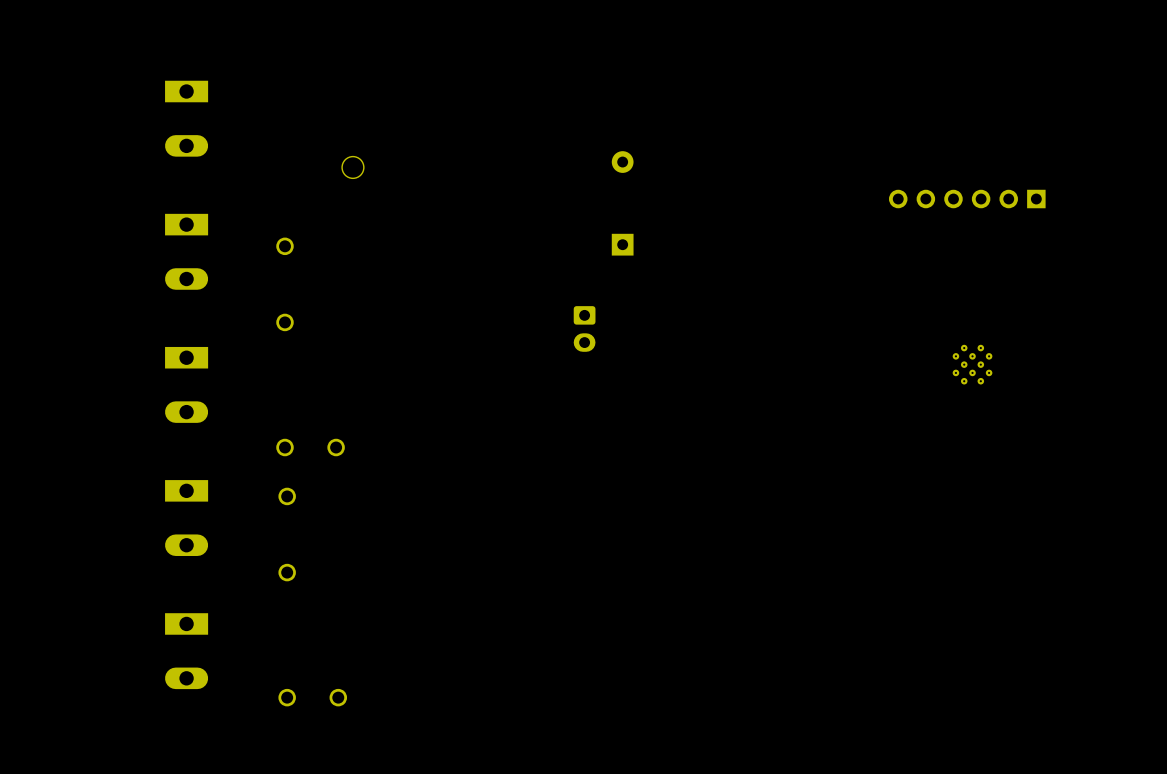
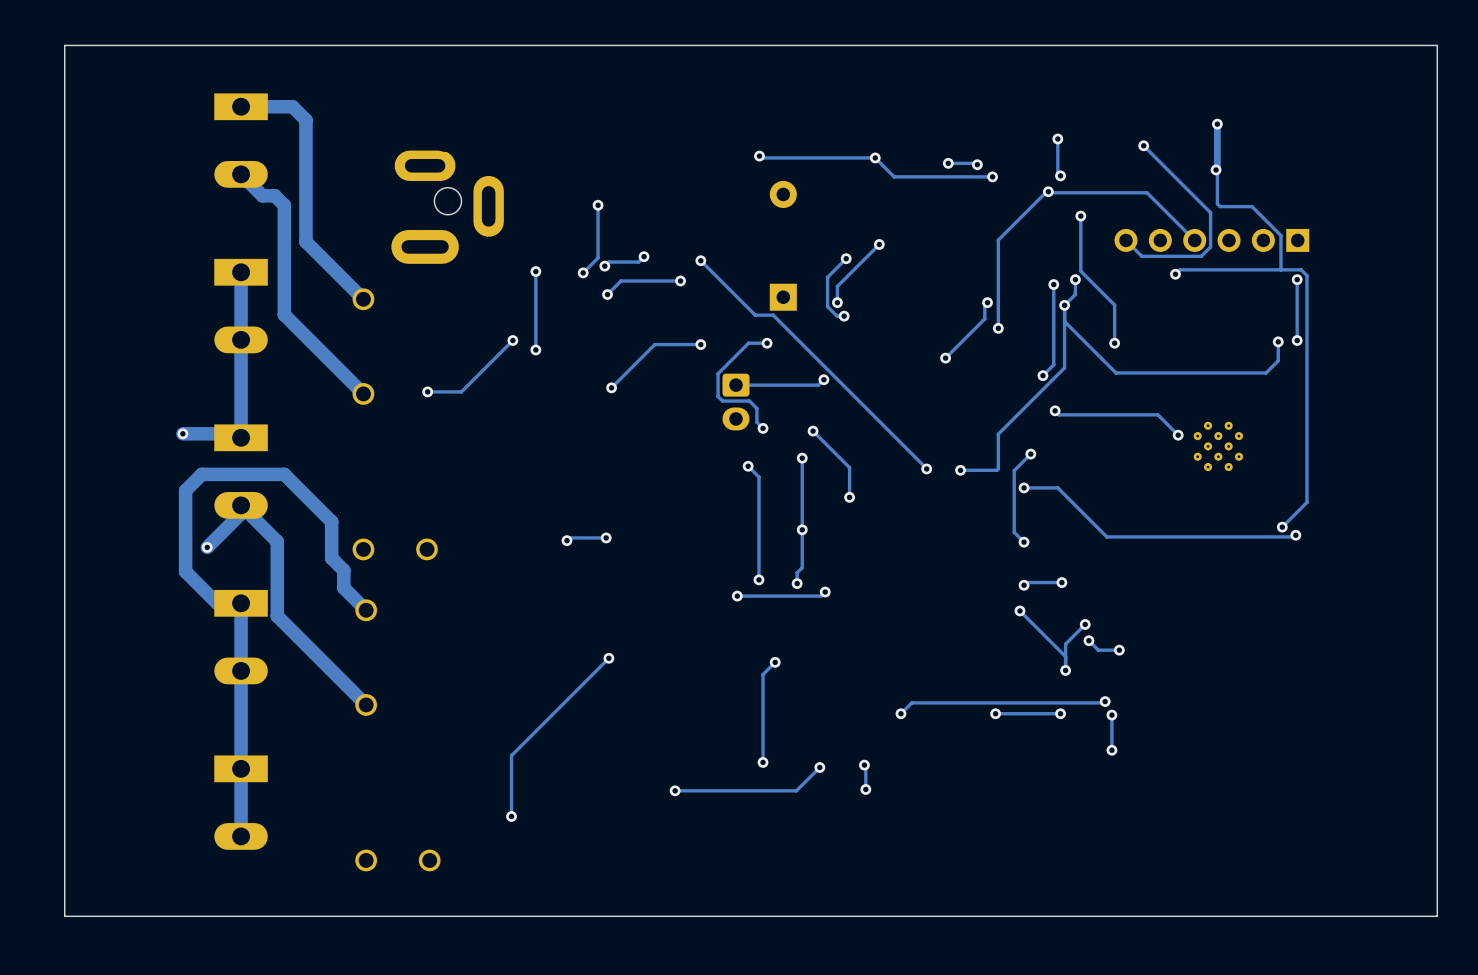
board edge: none -> (1437, 45) (64, 45) (64, 916) (1437, 916) (1437, 45)
track: none -> (241, 106) (292, 106) (305, 120) (305, 241) (363, 299)
track: none -> (1217, 124) (1217, 203) (1220, 206) (1252, 206) (1280, 235) (1280, 269)
via: none -> (1217, 124)
track: none -> (1057, 139) (1057, 173) (1060, 175)
via: none -> (1057, 139)
track: none -> (1143, 145) (1210, 212) (1210, 247) (1201, 256) (1141, 256) (1125, 240)
via: none -> (1143, 145)
track: none -> (759, 156) (761, 157) (875, 157) (894, 176) (992, 176)
via: none -> (759, 156)
via: none -> (875, 157)
track: none -> (948, 163) (977, 164)
via: none -> (948, 163)
via: none -> (977, 164)
via: none -> (1216, 169)
track: none -> (241, 174) (262, 195) (274, 195) (284, 205) (284, 314) (363, 393)
via: none -> (992, 176)
via: none -> (1060, 175)
via: none -> (1048, 191)
track: none -> (598, 205) (598, 258) (583, 272)
via: none -> (598, 205)
part: none -> (447, 207)
track: none -> (1080, 216) (1080, 271) (1114, 305) (1114, 343)
via: none -> (1080, 216)
track: none -> (1194, 240) (1147, 192) (1046, 191) (998, 240) (998, 328)
track: none -> (879, 244) (837, 286) (837, 302)
via: none -> (879, 244)
track: none -> (644, 256) (638, 262) (608, 262) (604, 266)
via: none -> (644, 256)
track: none -> (846, 258) (827, 277) (827, 306) (837, 316) (844, 316)
via: none -> (846, 258)
track: none -> (700, 260) (755, 315) (773, 315) (926, 468)
via: none -> (700, 260)
via: none -> (604, 266)
track: none -> (241, 272) (241, 437) (237, 433) (182, 433)
track: none -> (535, 271) (535, 349)
via: none -> (535, 271)
via: none -> (583, 272)
track: none -> (1175, 274) (1179, 269) (1301, 269) (1306, 275) (1306, 502) (1282, 527)
via: none -> (1175, 274)
track: none -> (1075, 279) (1075, 294) (1064, 305) (1064, 367) (998, 434) (996, 470) (960, 470)
via: none -> (1075, 279)
track: none -> (1297, 279) (1297, 340)
via: none -> (1297, 279)
track: none -> (680, 281) (621, 281) (607, 294)
via: none -> (680, 281)
track: none -> (1053, 284) (1053, 364) (1042, 375)
via: none -> (1053, 284)
via: none -> (607, 294)
via: none -> (837, 302)
track: none -> (987, 302) (984, 305) (984, 318) (945, 358)
via: none -> (987, 302)
via: none -> (1064, 305)
via: none -> (844, 316)
track: none -> (1064, 321) (1115, 372) (1266, 372) (1278, 360) (1278, 341)
via: none -> (998, 328)
track: none -> (512, 340) (461, 391) (427, 391)
via: none -> (512, 340)
via: none -> (1297, 340)
via: none -> (1278, 341)
track: none -> (767, 343) (748, 343) (718, 373) (718, 396) (722, 401) (749, 401) (756, 408) (756, 422) (763, 428)
via: none -> (767, 343)
via: none -> (1114, 343)
track: none -> (700, 344) (654, 344) (611, 387)
via: none -> (700, 344)
via: none -> (535, 349)
via: none -> (945, 358)
via: none -> (1042, 375)
track: none -> (823, 379) (818, 385) (735, 385)
via: none -> (823, 379)
via: none -> (611, 387)
via: none -> (427, 391)
track: none -> (1055, 410) (1059, 414) (1157, 414) (1178, 435)
via: none -> (1055, 410)
via: none -> (763, 428)
track: none -> (813, 431) (849, 467) (849, 497)
via: none -> (813, 431)
via: none -> (182, 433)
via: none -> (1178, 435)
track: none -> (1030, 454) (1014, 470) (1014, 532) (1024, 542)
via: none -> (1030, 454)
track: none -> (802, 458) (802, 567) (797, 572) (797, 583)
via: none -> (802, 458)
track: none -> (748, 466) (758, 477) (758, 579)
via: none -> (748, 466)
via: none -> (926, 468)
via: none -> (960, 470)
track: none -> (1024, 487) (1057, 487) (1106, 536) (1294, 536) (1295, 535)
via: none -> (1024, 487)
via: none -> (849, 497)
via: none -> (1282, 527)
via: none -> (802, 529)
via: none -> (1295, 535)
track: none -> (606, 537) (569, 537) (566, 540)
via: none -> (606, 537)
via: none -> (566, 540)
via: none -> (1024, 542)
track: none -> (207, 547) (241, 513) (241, 505) (277, 541) (277, 616) (366, 704)
via: none -> (207, 547)
via: none -> (758, 579)
via: none -> (797, 583)
track: none -> (1061, 582) (1026, 582) (1024, 585)
via: none -> (1061, 582)
via: none -> (1024, 585)
track: none -> (825, 592) (821, 596) (737, 596)
via: none -> (825, 592)
via: none -> (737, 596)
track: none -> (366, 610) (343, 587) (343, 570) (331, 558) (331, 521) (284, 474) (201, 474) (185, 490) (185, 571) (217, 603) (241, 603) (241, 836)
track: none -> (1019, 610) (1065, 656)
via: none -> (1019, 610)
track: none -> (1085, 624) (1065, 644) (1065, 670)
via: none -> (1085, 624)
track: none -> (1088, 640) (1098, 650) (1119, 650)
via: none -> (1088, 640)
via: none -> (1119, 650)
track: none -> (608, 658) (511, 755) (511, 816)
via: none -> (608, 658)
track: none -> (775, 662) (763, 674) (763, 762)
via: none -> (775, 662)
via: none -> (1065, 670)
track: none -> (1105, 701) (911, 702) (900, 713)
via: none -> (1105, 701)
via: none -> (900, 713)
via: none -> (995, 713)
track: none -> (1060, 713) (995, 713)
via: none -> (1060, 713)
track: none -> (1111, 715) (1111, 750)
via: none -> (1111, 715)
via: none -> (1111, 750)
via: none -> (763, 762)
track: none -> (864, 765) (865, 789)
via: none -> (864, 765)
track: none -> (819, 767) (796, 790) (675, 790)
via: none -> (819, 767)
via: none -> (865, 789)
via: none -> (675, 790)
via: none -> (511, 816)

